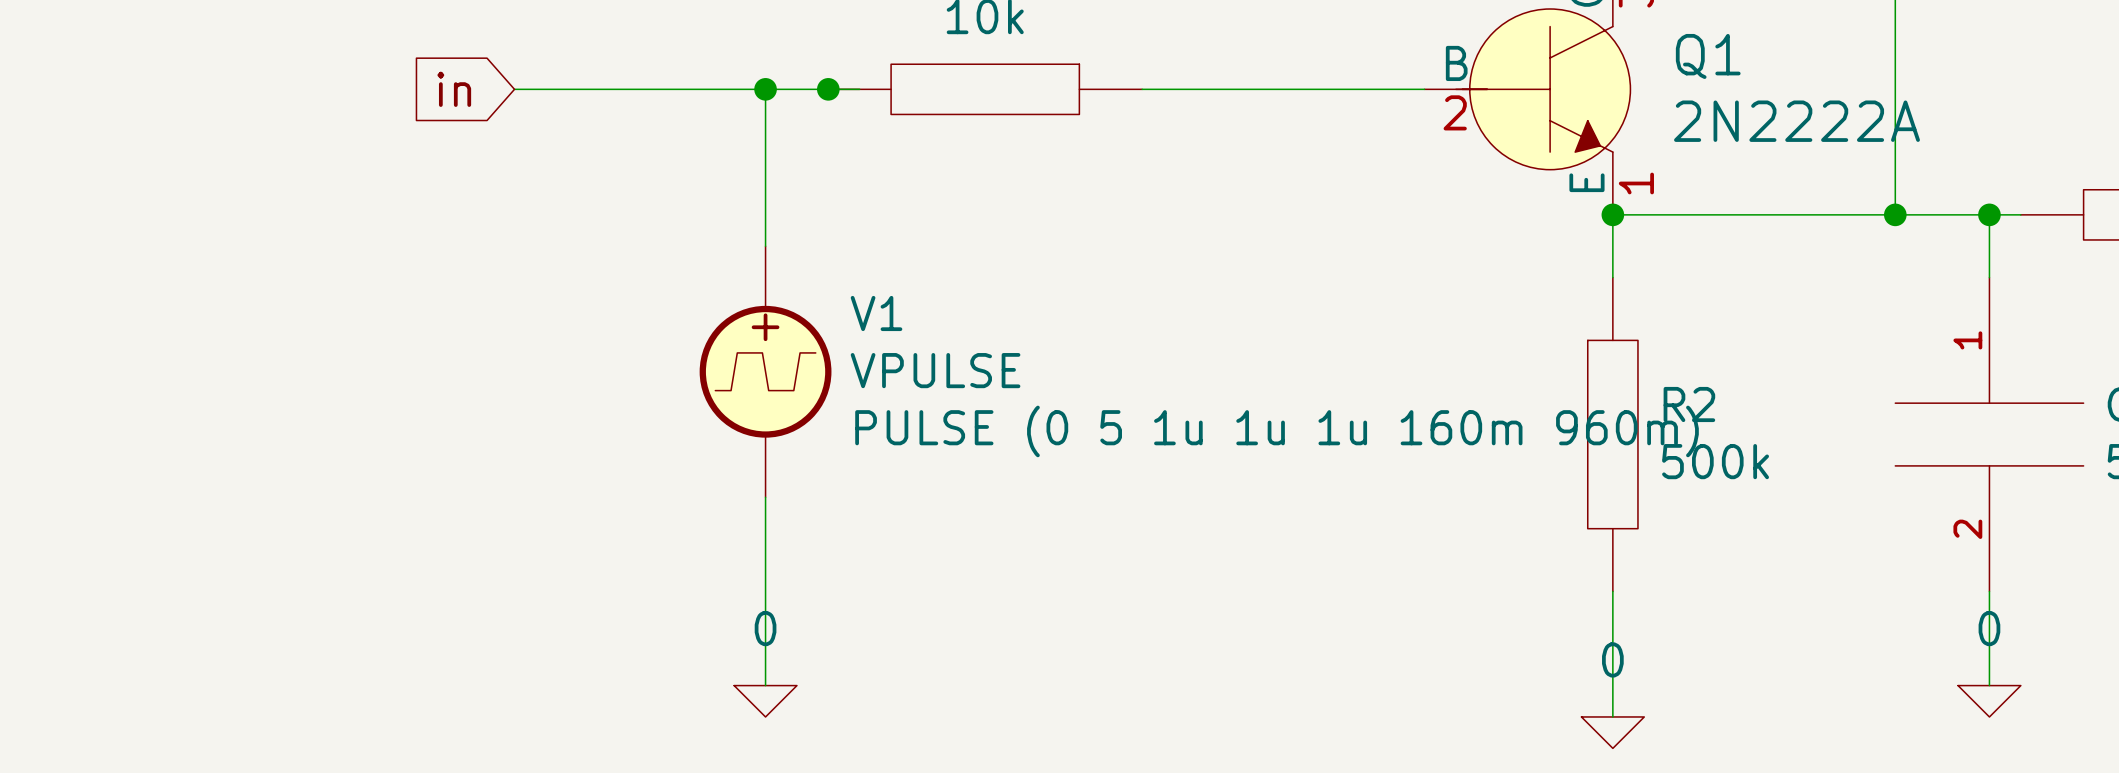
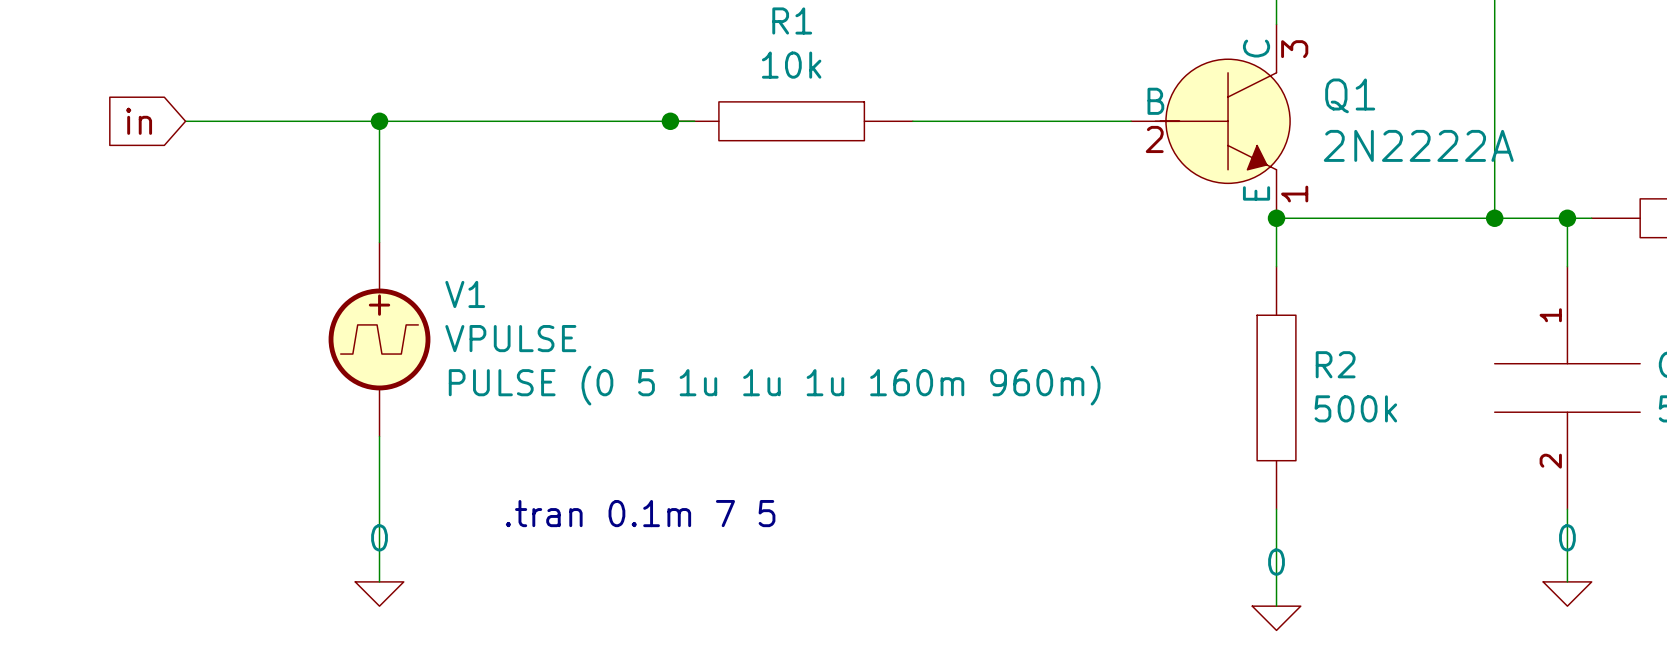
wire: none -> (185, 121) (427, 121)
junction: none -> (379, 121)
global label position: in (454, 89) -> in (139, 121)
wire: (765, 89) (765, 246) -> (379, 121) (379, 242)
junction: (765, 89) -> none
V1 position: (765, 371) -> (379, 339)
wire: (765, 497) (765, 685) -> (379, 436) (379, 581)
text: none -> .tran 0.1m 7 5 (640, 513)
power symbol position: 0 (765, 701) -> 0 (379, 594)

